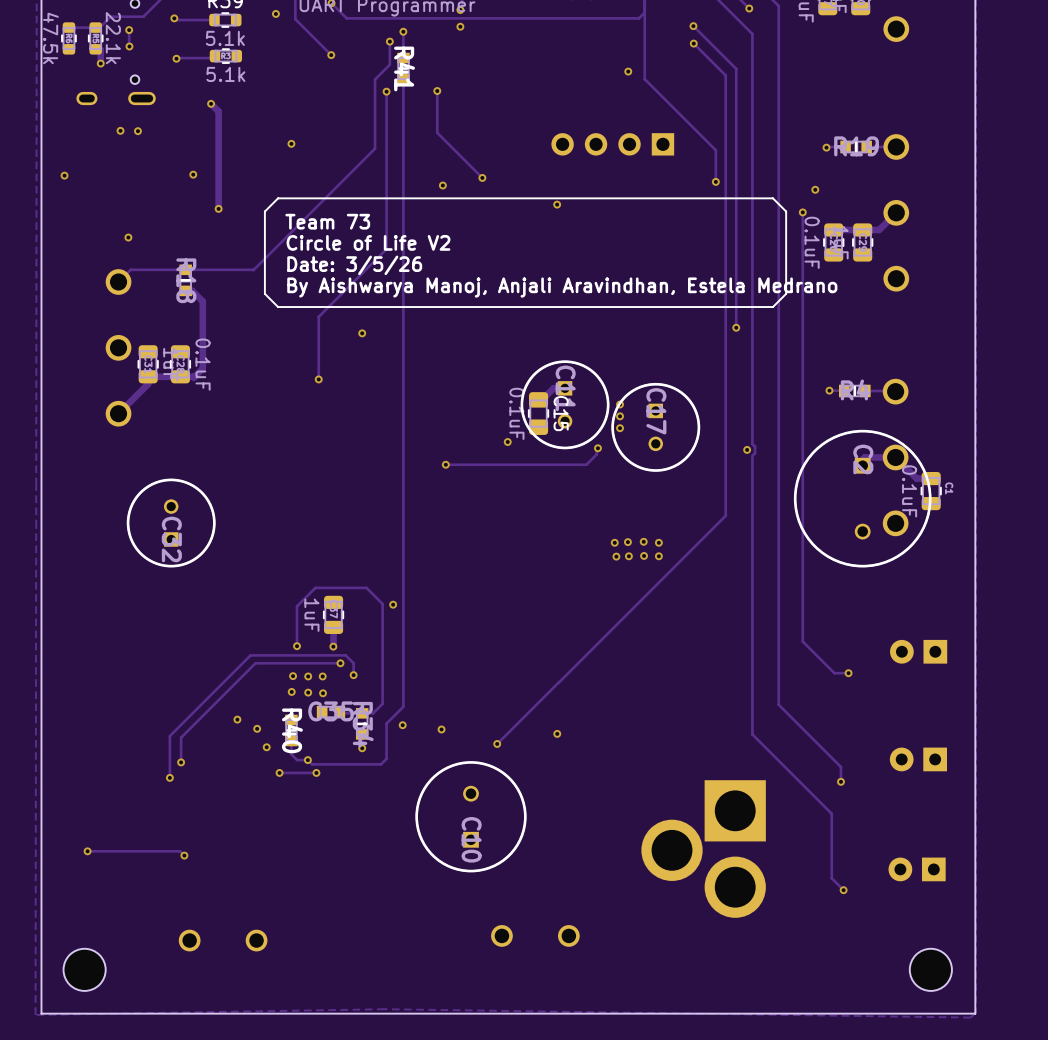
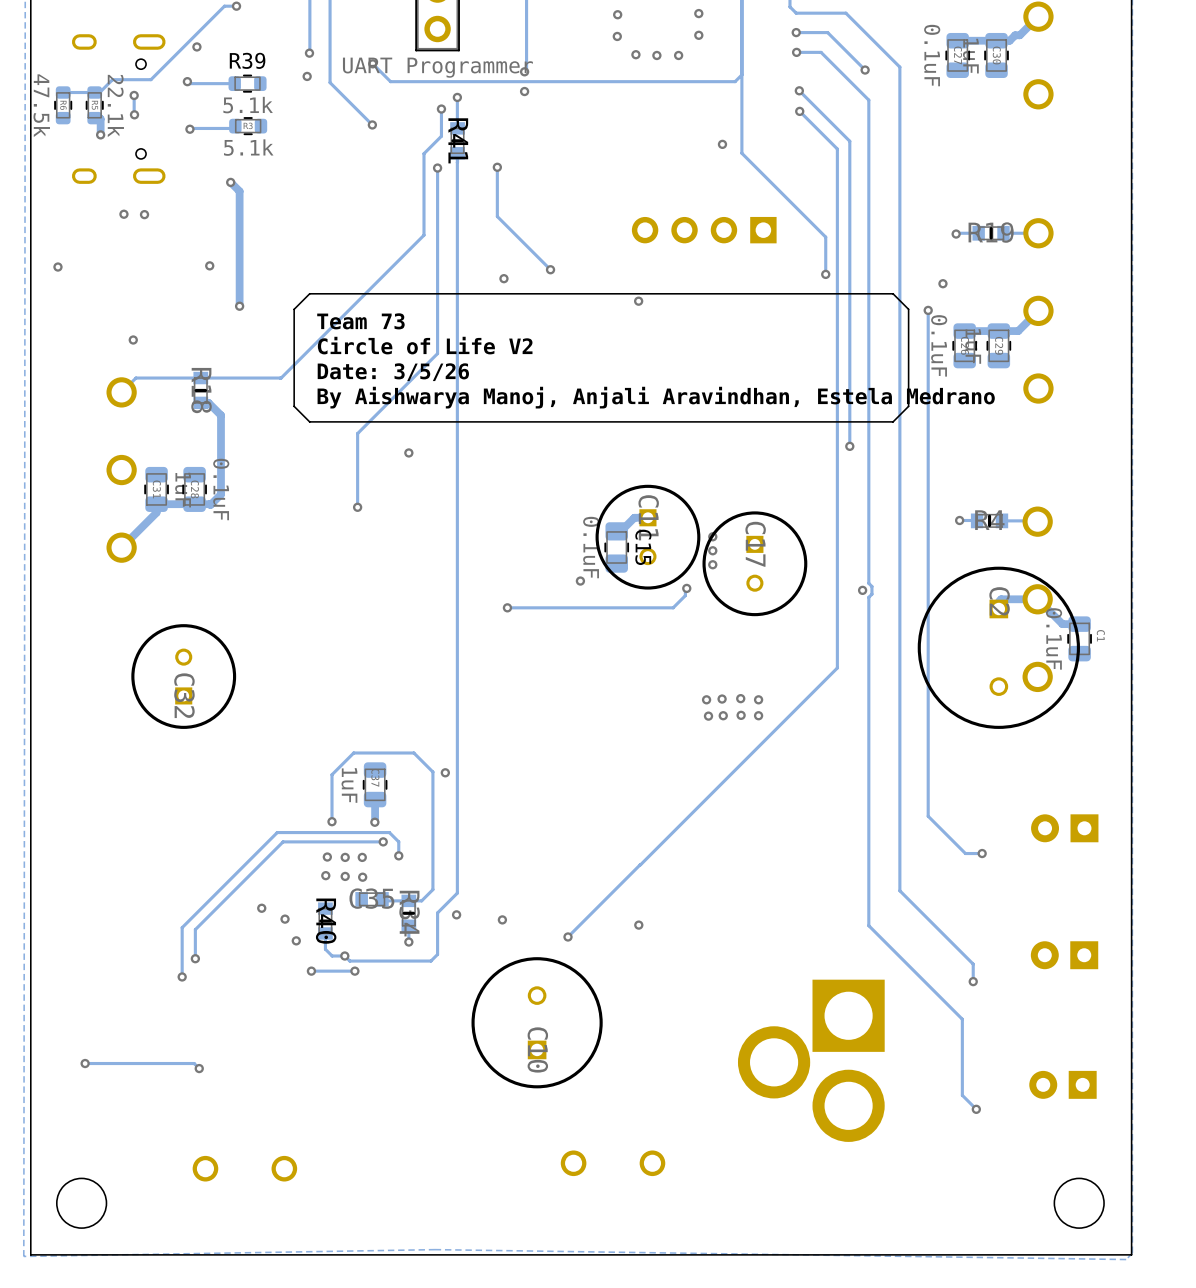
via: (291, 143) -> none

